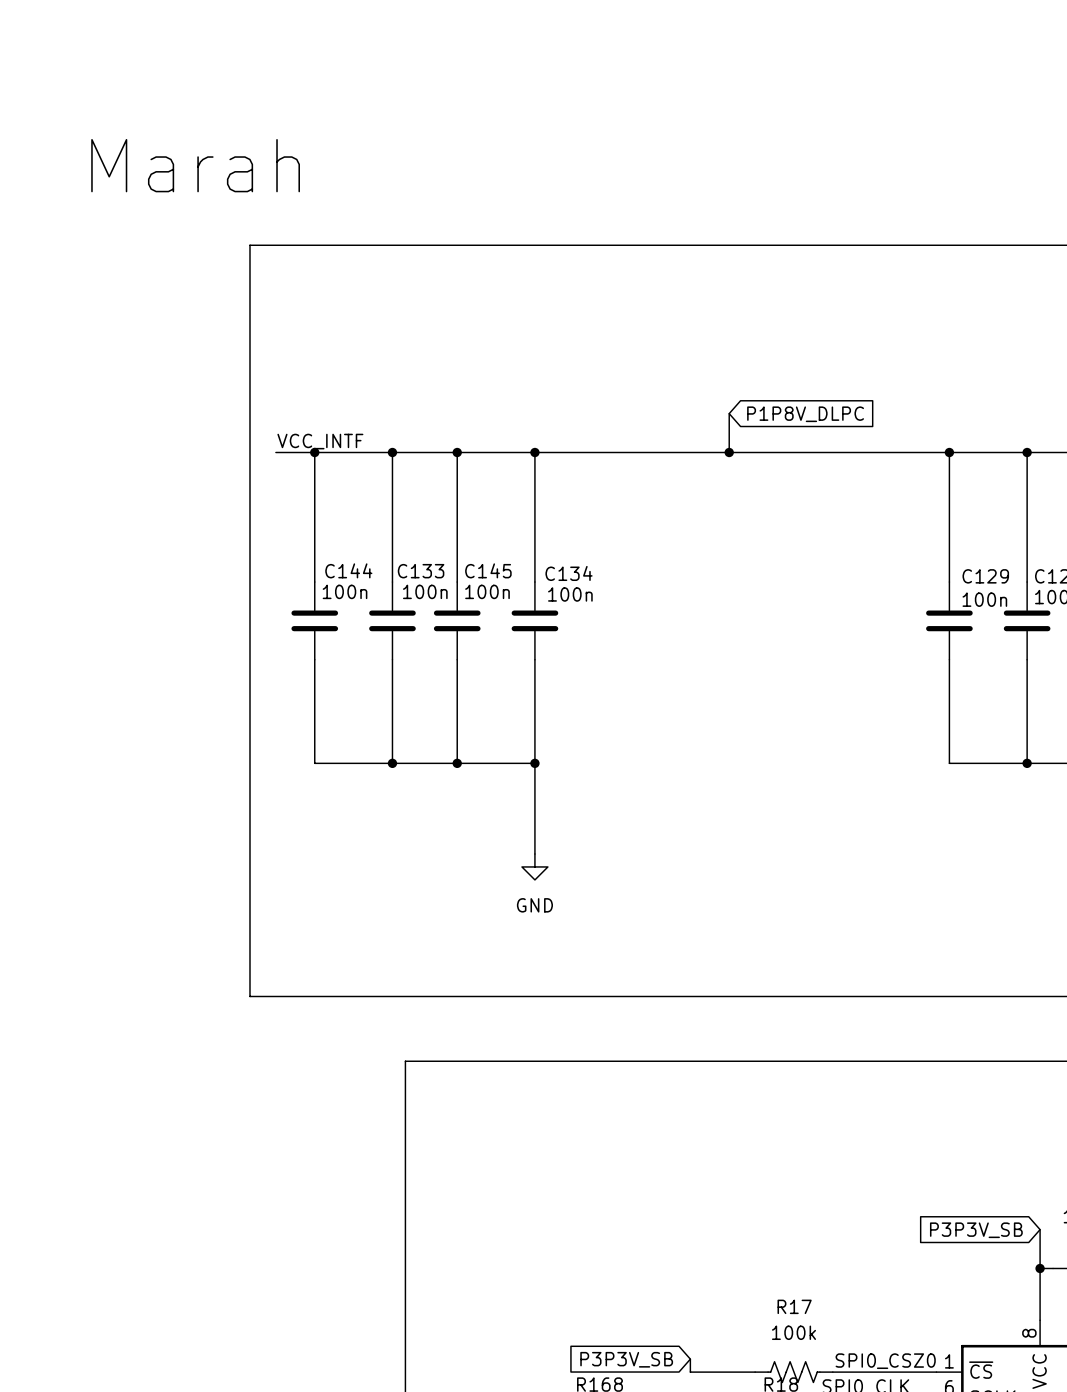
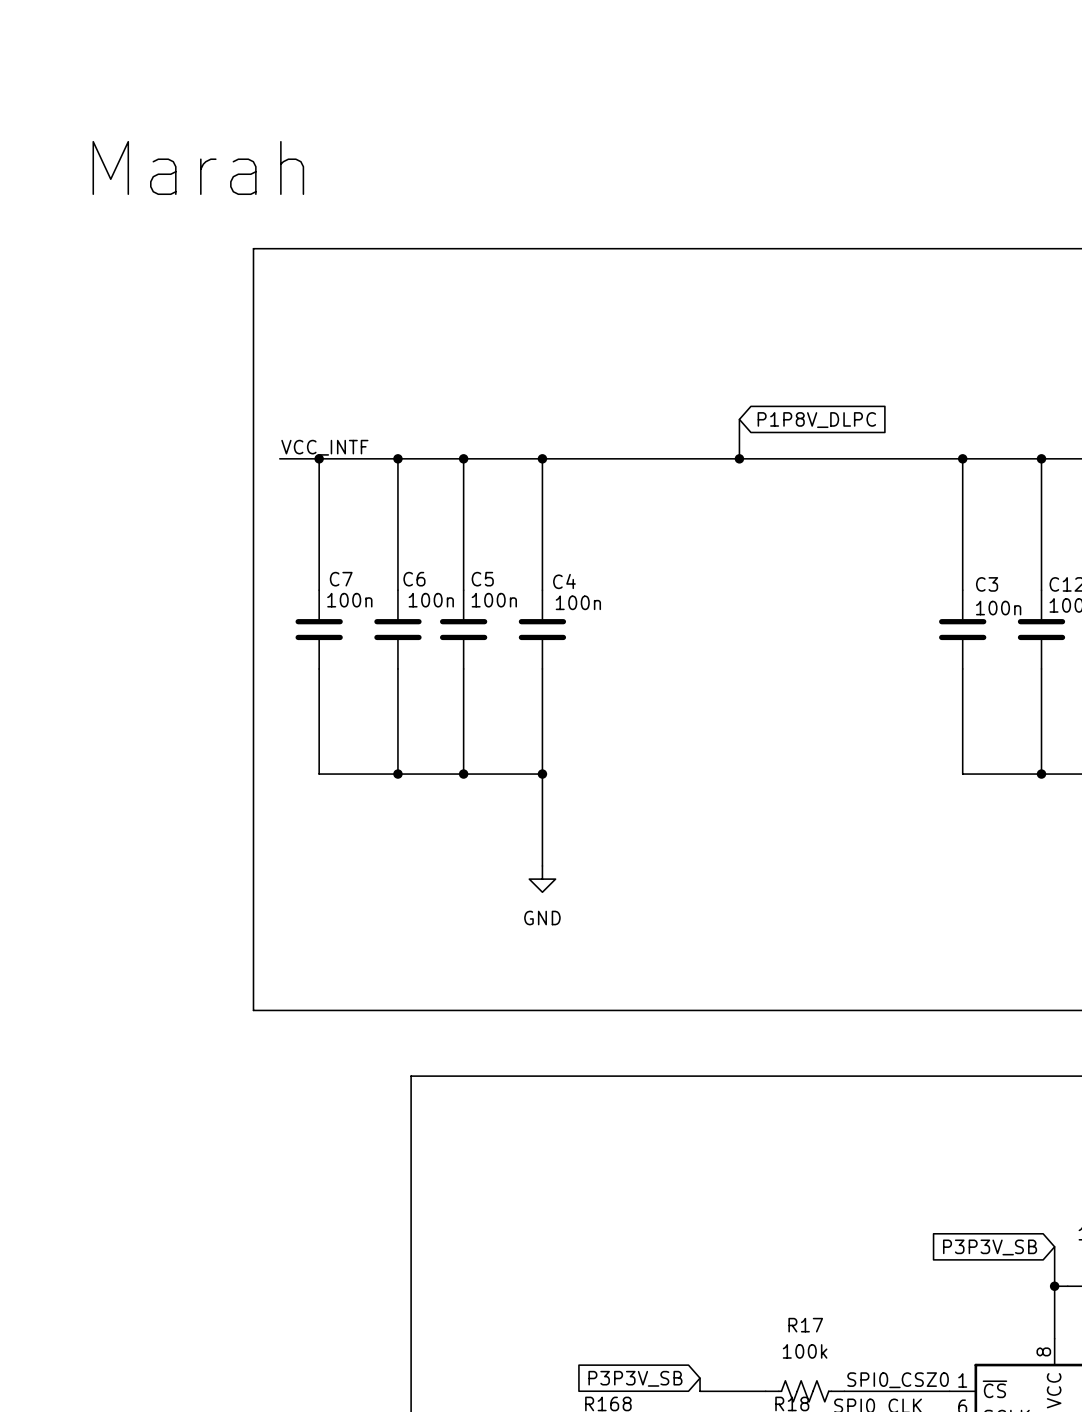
C144 name: C144 (348, 570) -> C7 (341, 579)
C145 name: C145 (488, 570) -> C5 (482, 579)
C133 name: C133 (421, 571) -> C6 (414, 579)
C134 name: C134 (569, 573) -> C4 (564, 581)
C129 name: C129 (985, 576) -> C3 (987, 584)

